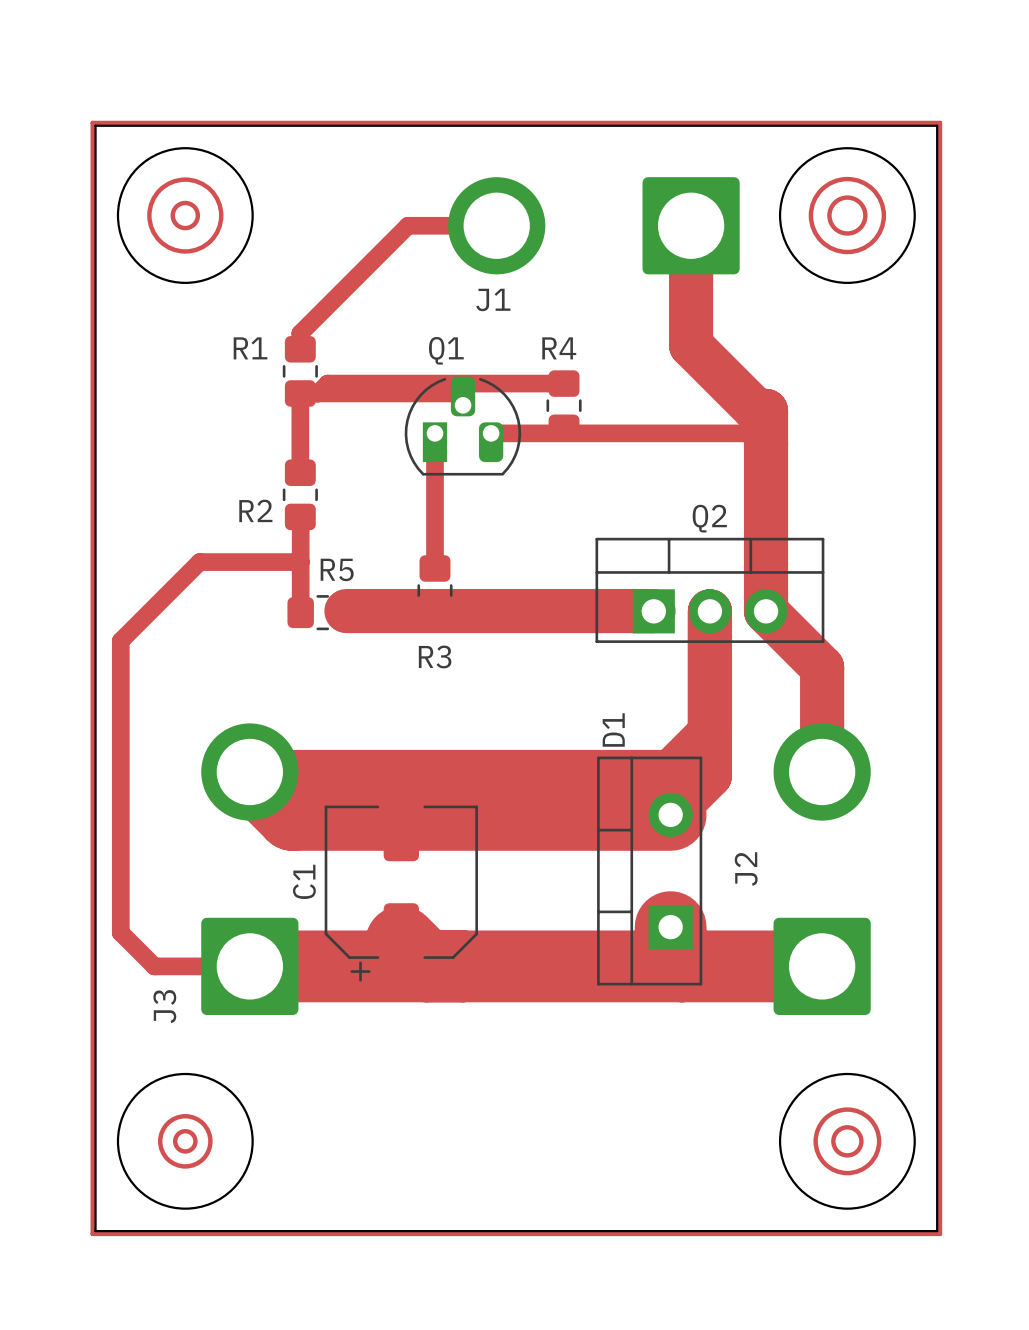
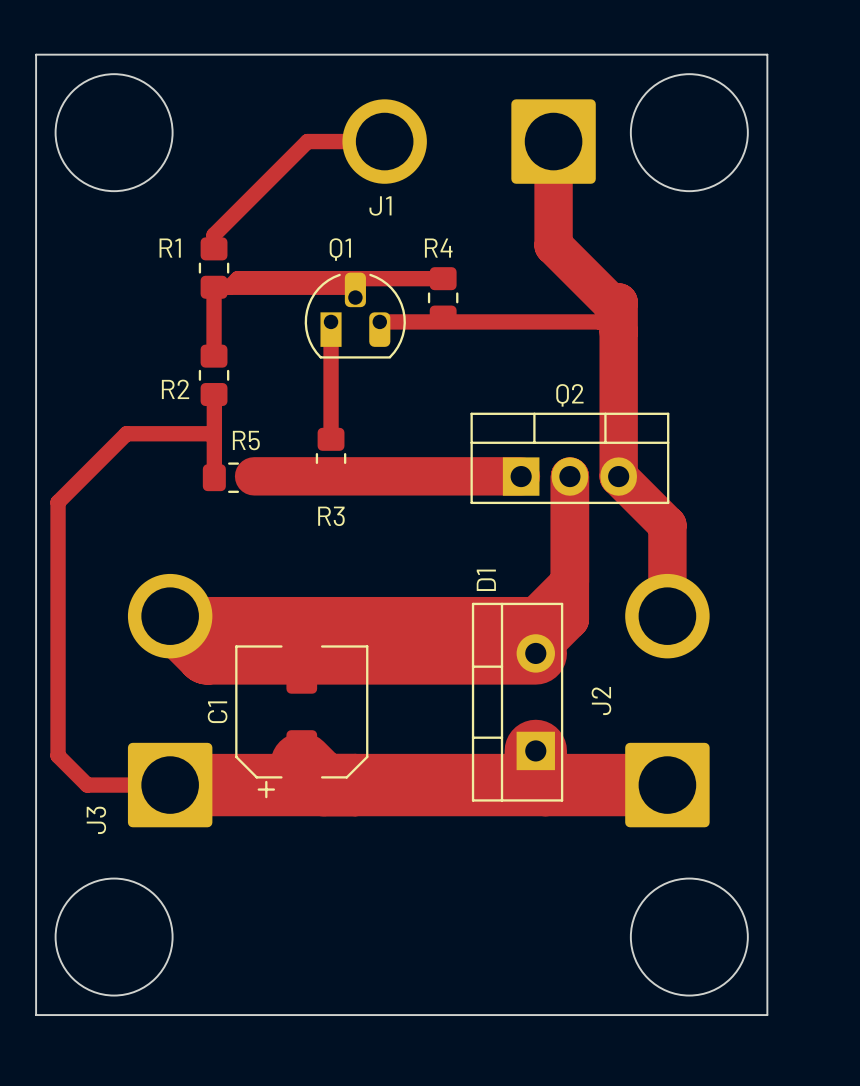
top track: (92, 122) (939, 122) (939, 1233) (92, 1233) (92, 122) -> none
drawing: [808, 176, 887, 255] -> none
drawing: [147, 177, 224, 254] -> none
drawing: [813, 1107, 882, 1176] -> none
drawing: [158, 1114, 213, 1169] -> none

